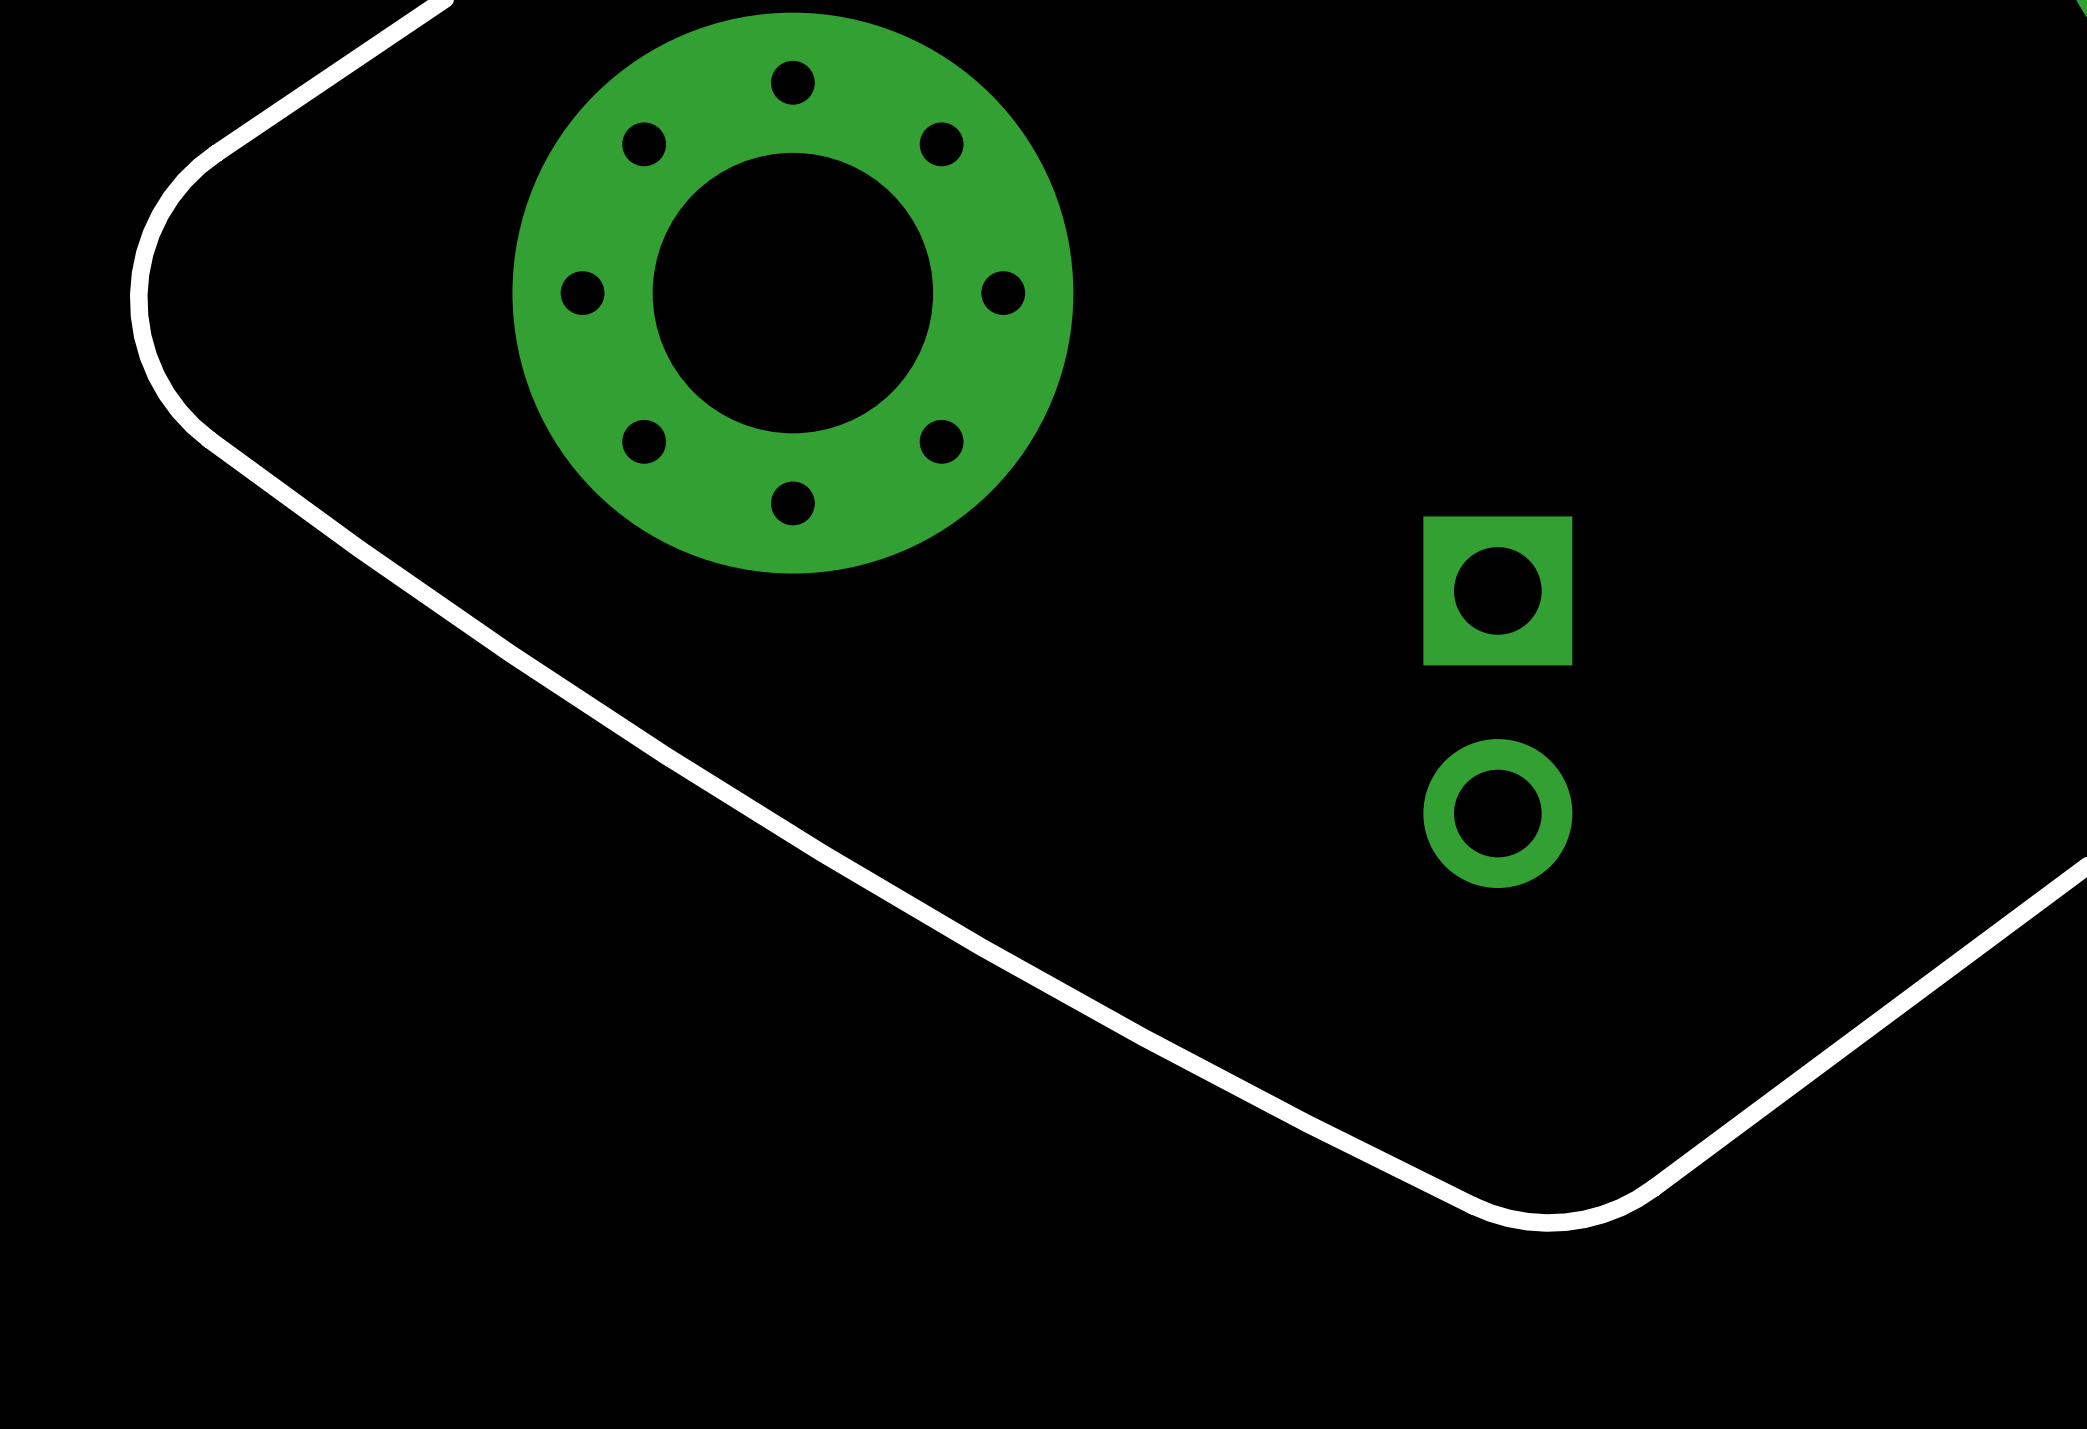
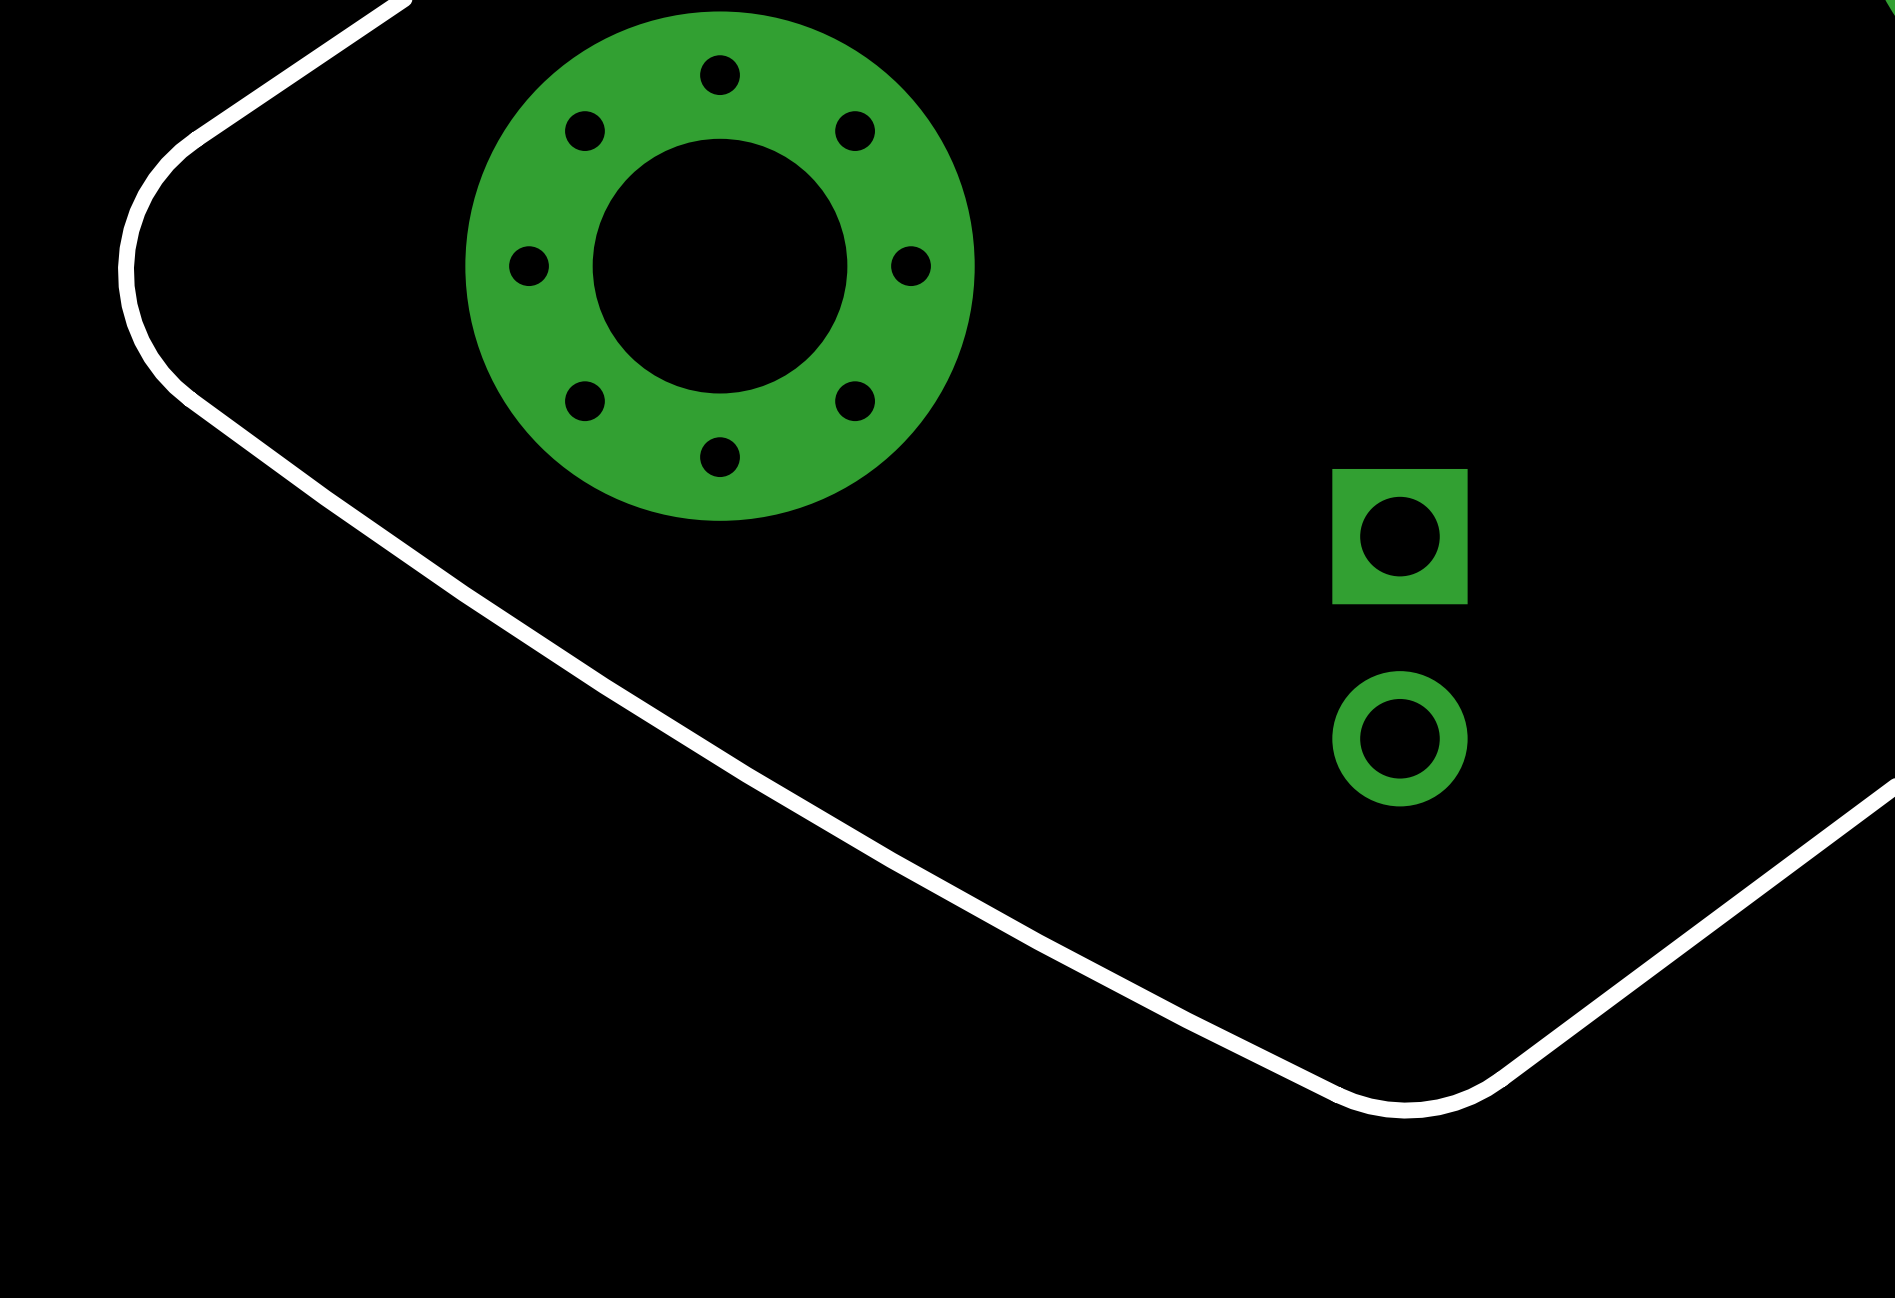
part position: (1497, 702) -> (1399, 637)

